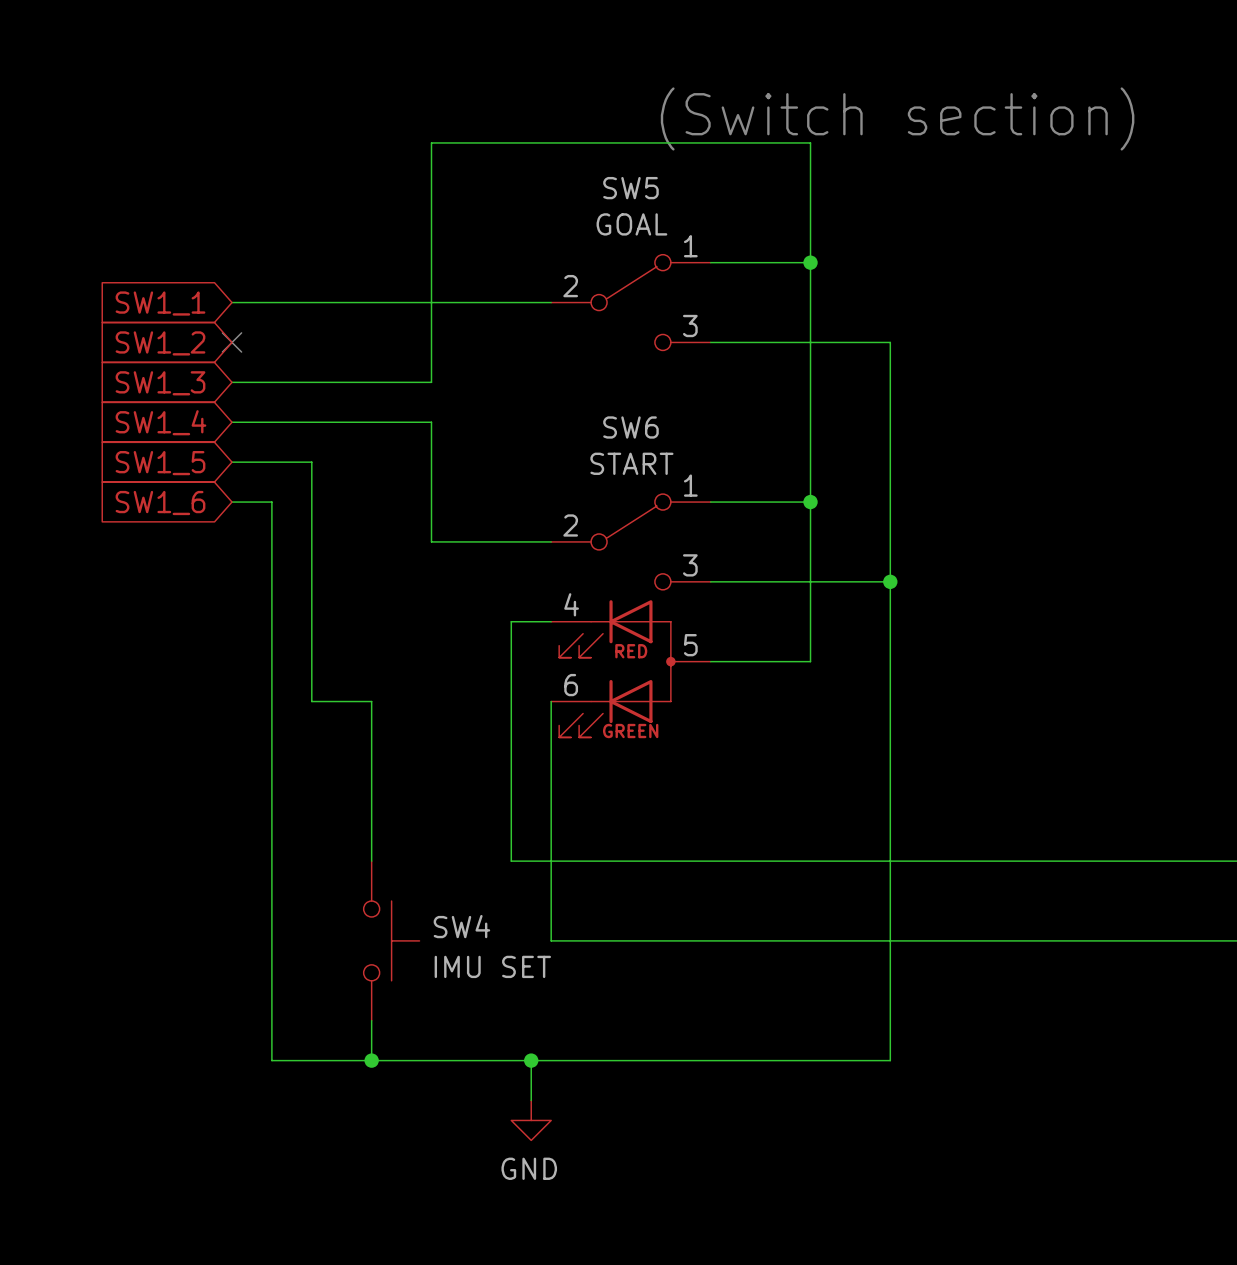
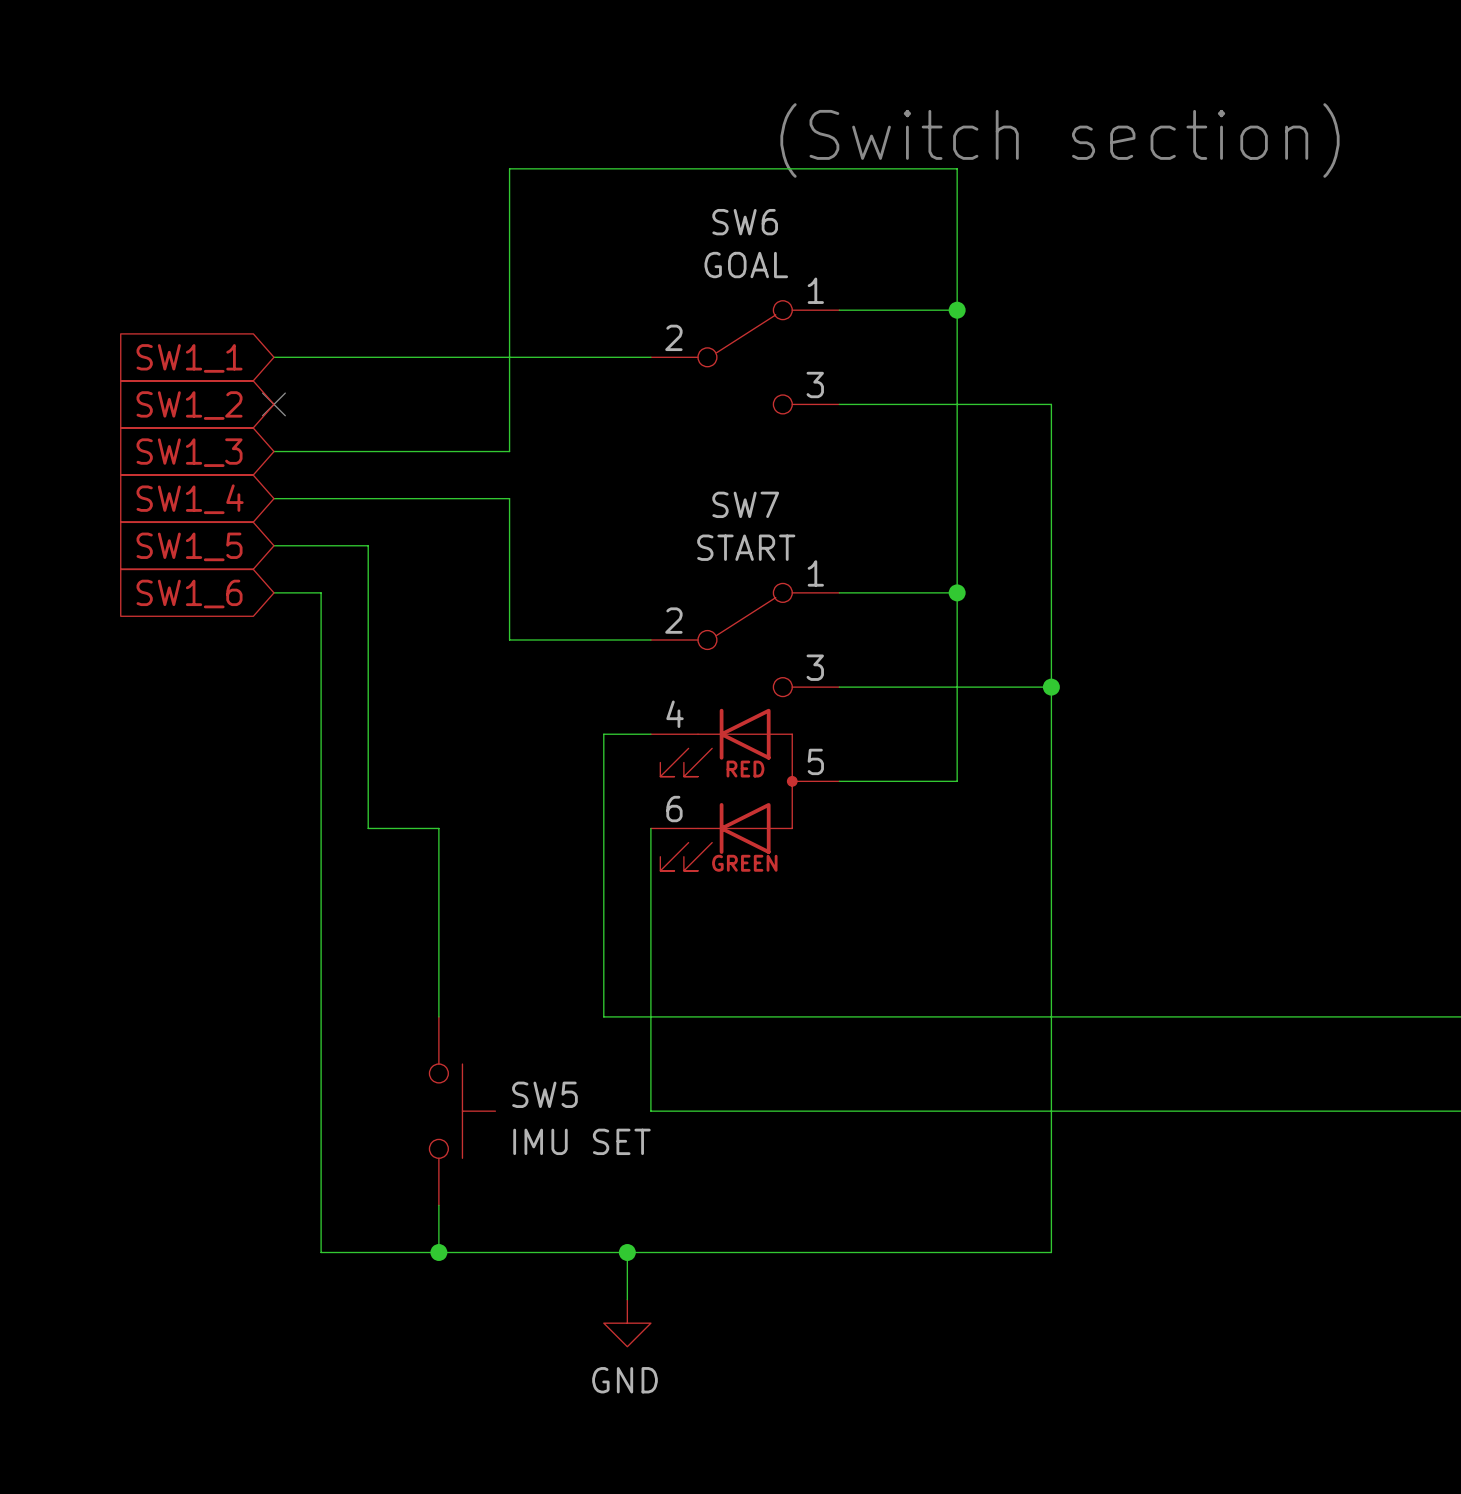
SW5 name: SW5 (630, 188) -> SW6 (745, 222)
SW6 name: SW6 (630, 427) -> SW7 (745, 504)
SW4 name: SW4 (461, 926) -> SW5 (544, 1094)

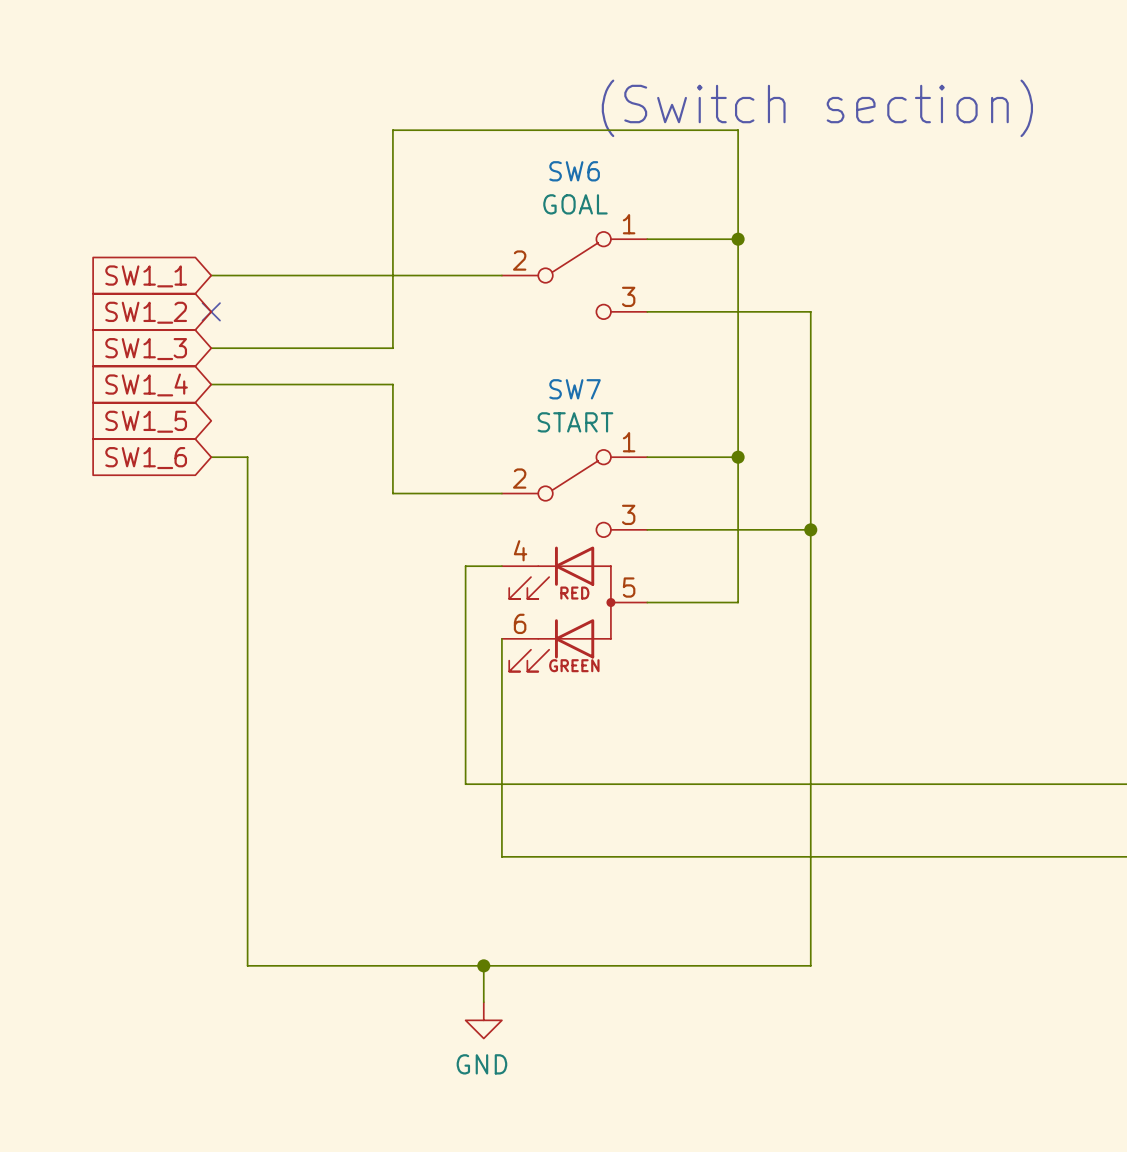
wire: (273, 545) (368, 545) (368, 828) (438, 828) (438, 1016) -> none
SW5: IMU SET (462, 1111) -> none
wire: (438, 1205) (438, 1252) -> none
junction: (438, 1252) -> none

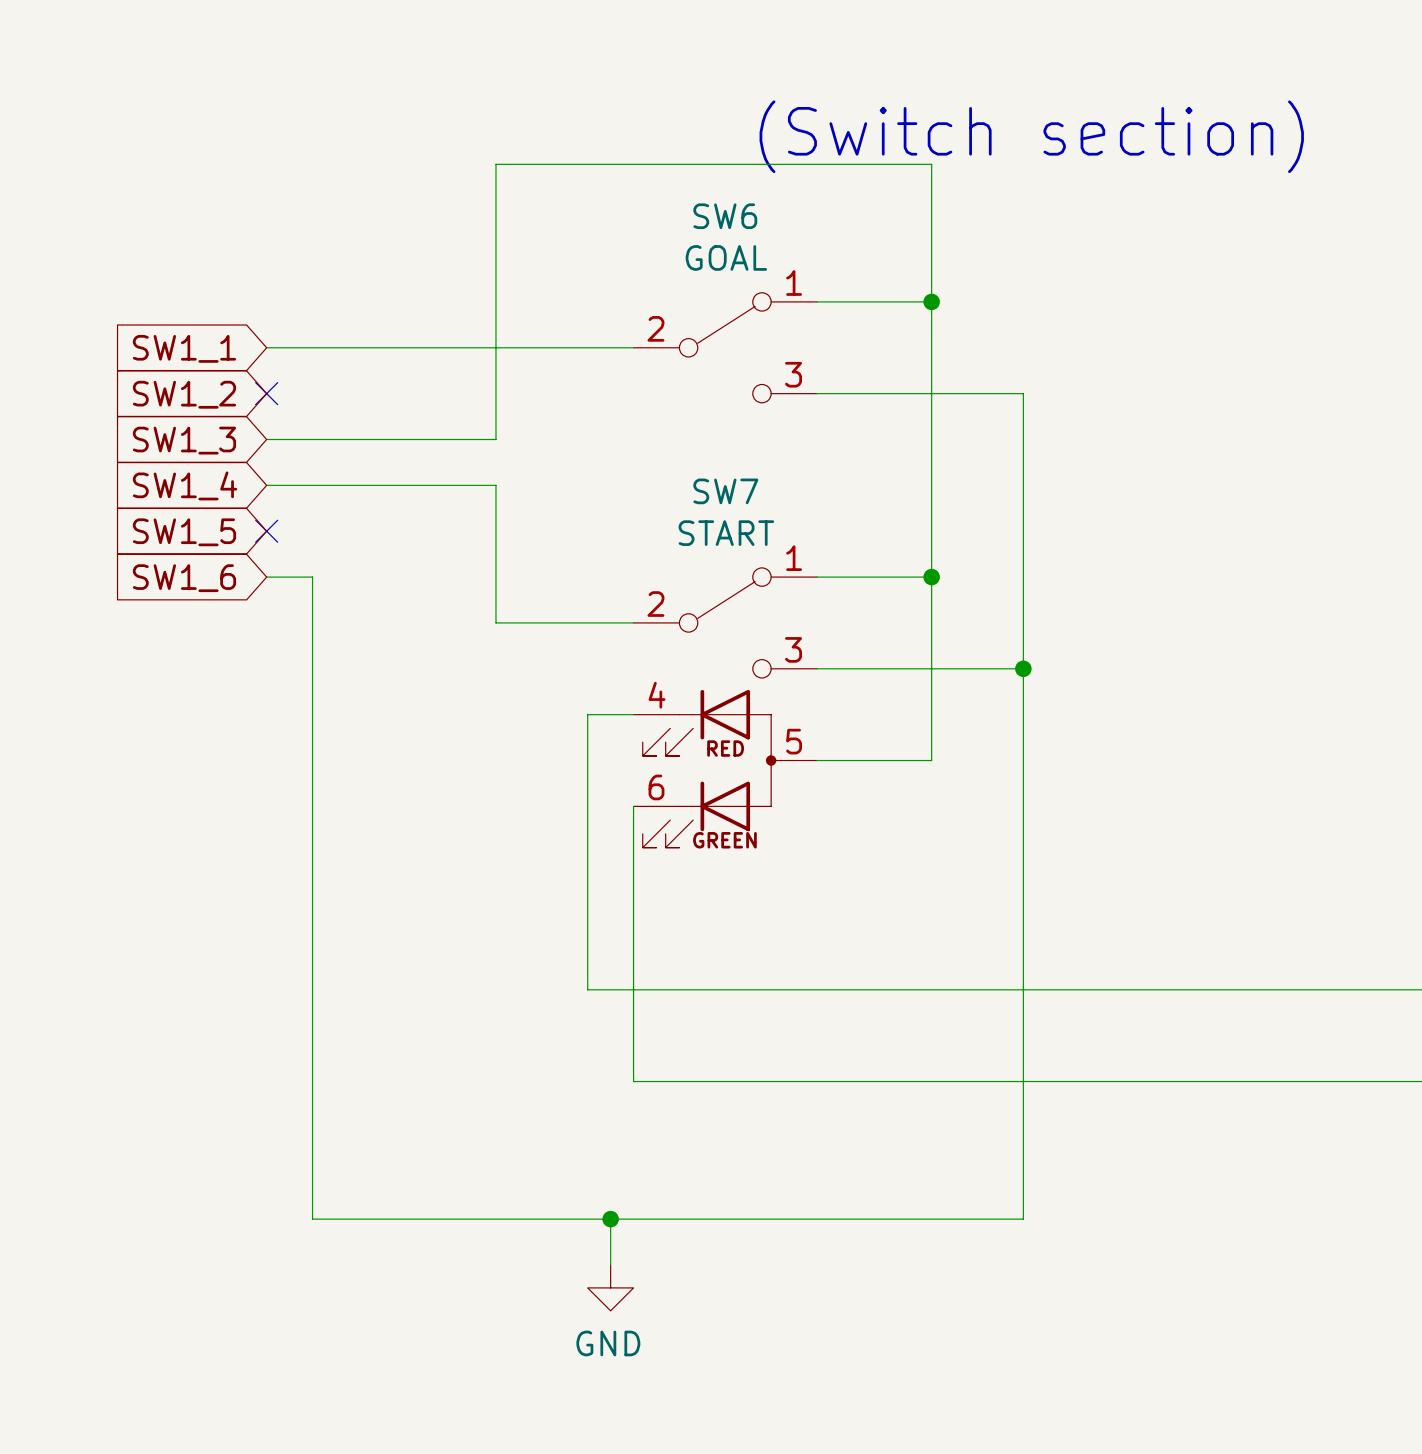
no-connect mark: none -> (266, 531)

